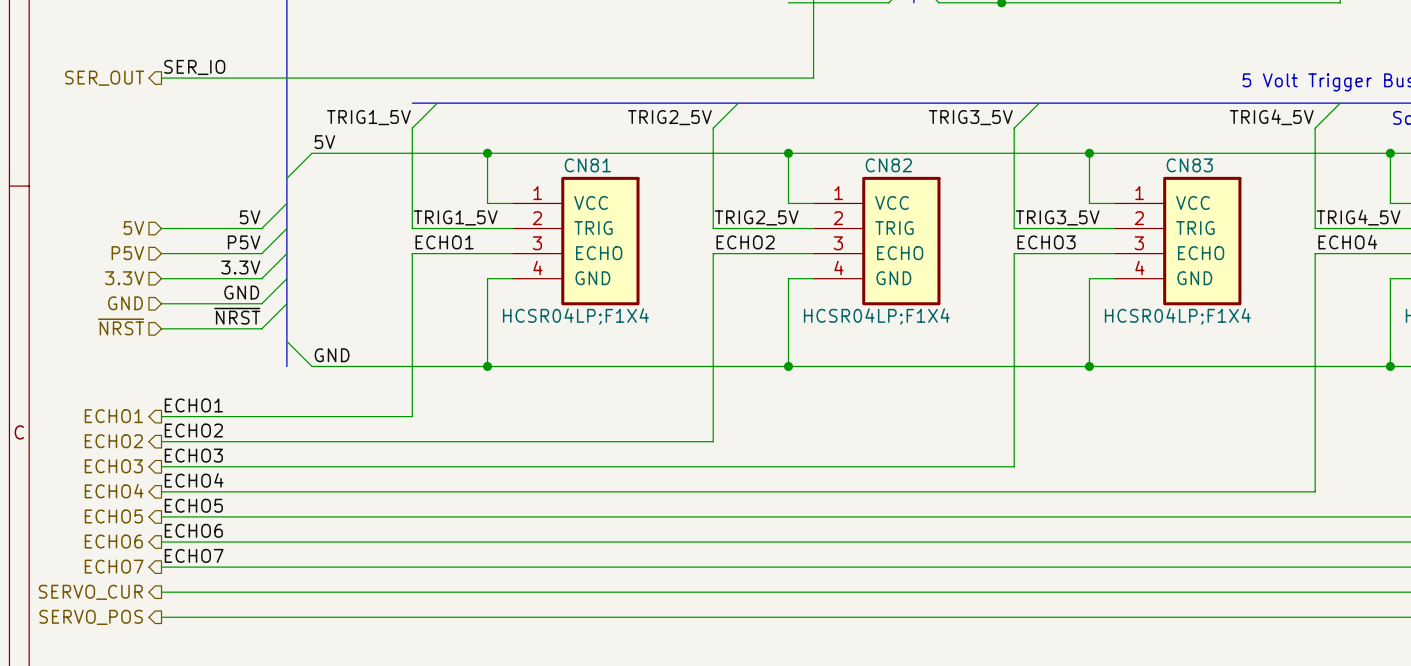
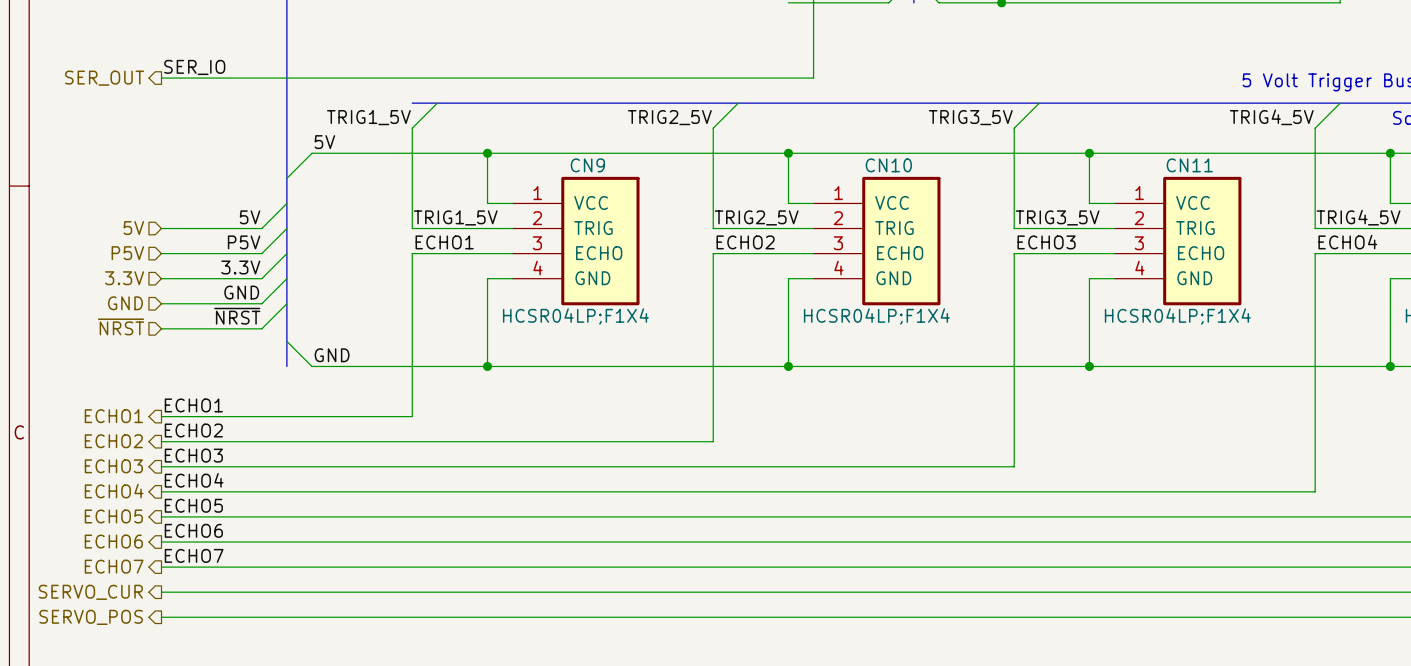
CN81 name: CN81 (587, 165) -> CN9 (587, 165)
CN82 name: CN82 (888, 165) -> CN10 (888, 165)
CN83 name: CN83 (1189, 165) -> CN11 (1189, 165)

